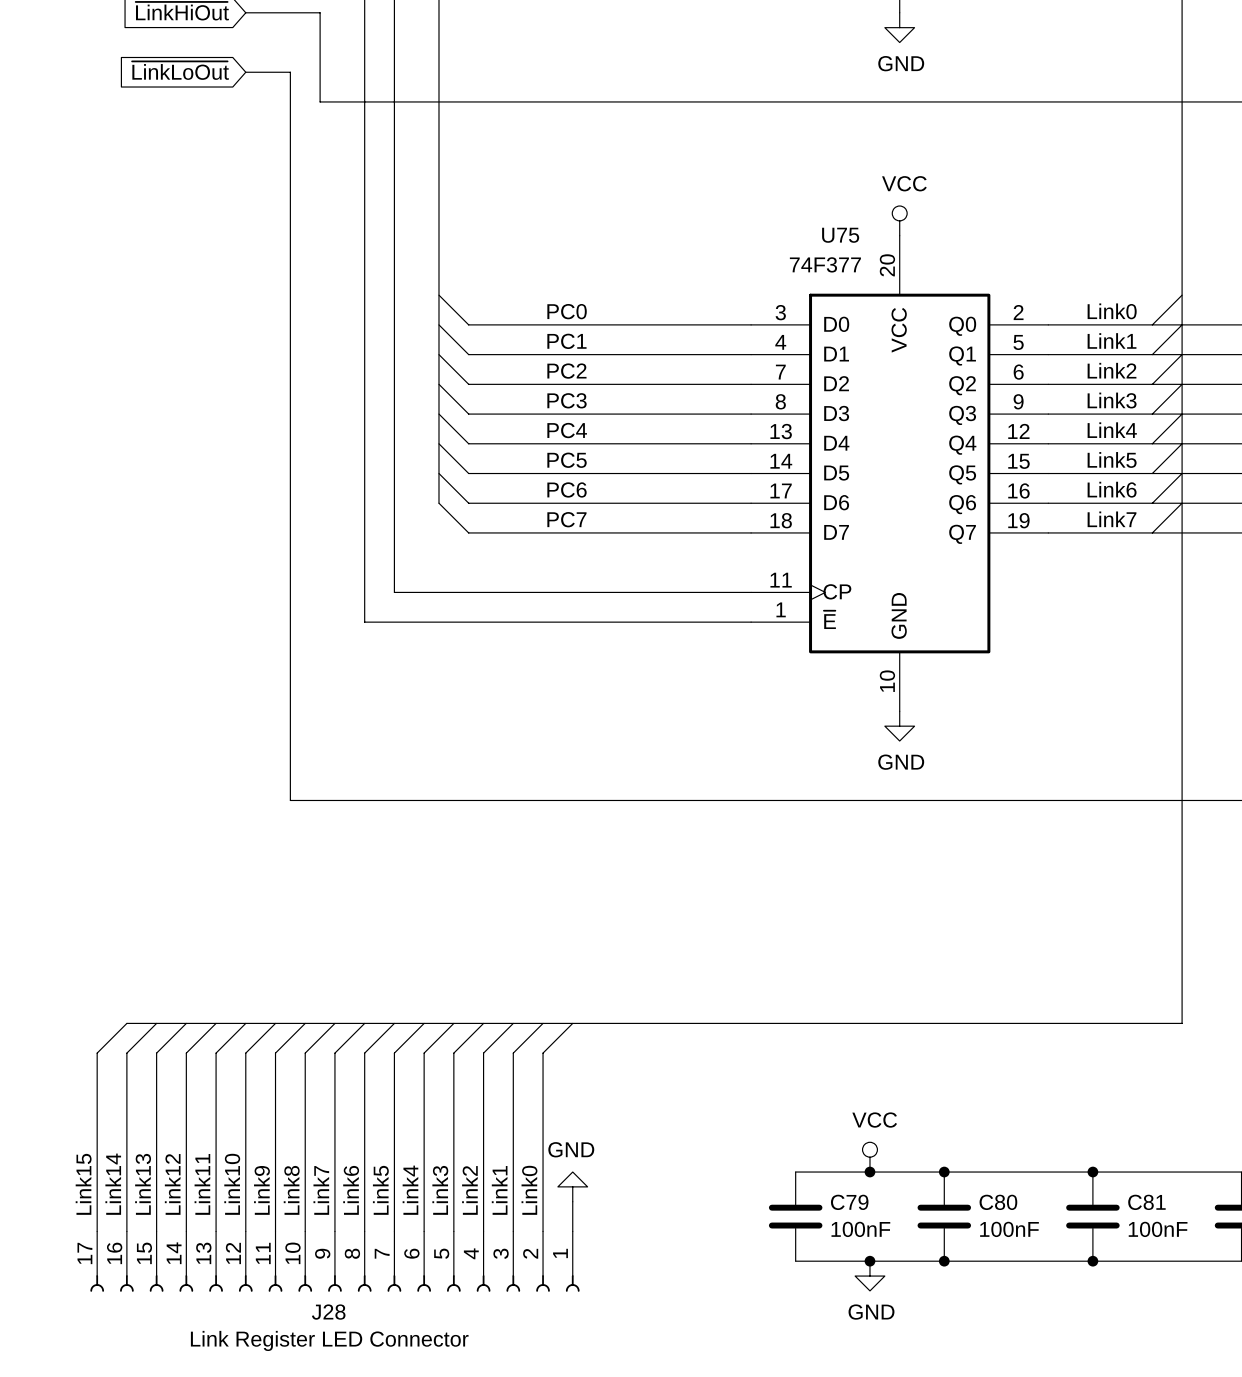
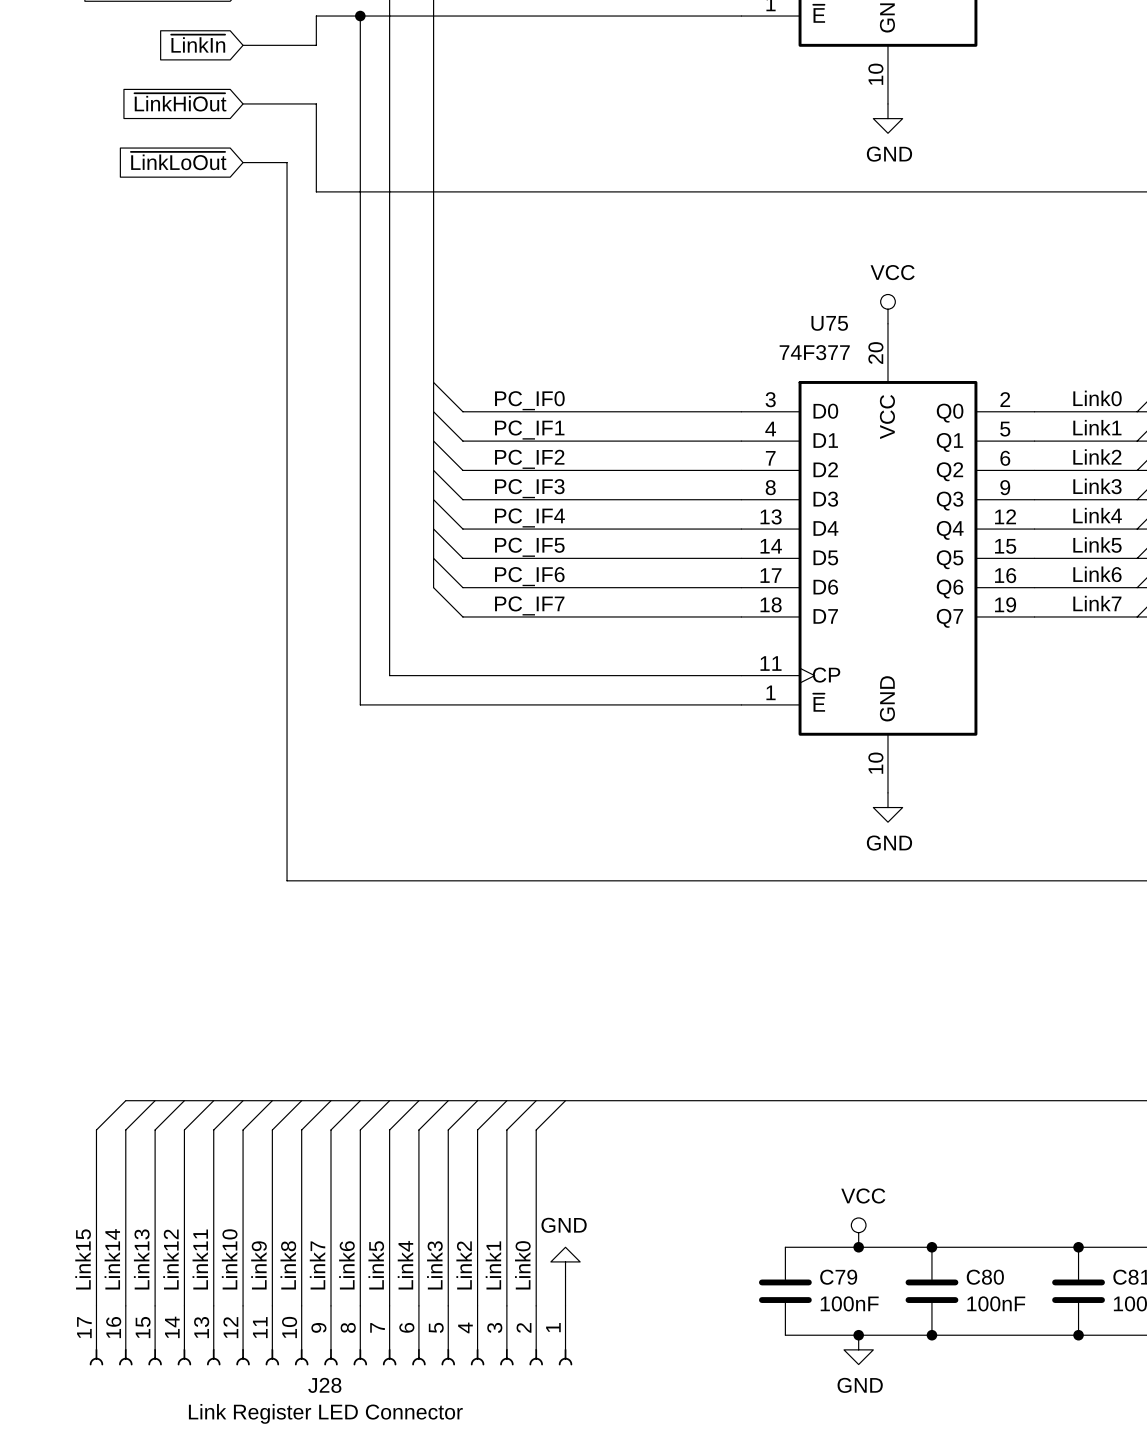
label: PC0 (567, 311) -> PC_IF0 (529, 400)
label: PC1 (566, 341) -> PC_IF1 (529, 430)
label: PC2 (566, 371) -> PC_IF2 (529, 459)
label: PC3 (567, 400) -> PC_IF3 (529, 488)
label: PC4 (567, 430) -> PC_IF4 (529, 517)
label: PC5 (567, 460) -> PC_IF5 (529, 547)
label: PC6 (567, 489) -> PC_IF6 (529, 576)
label: PC7 (566, 519) -> PC_IF7 (529, 605)

